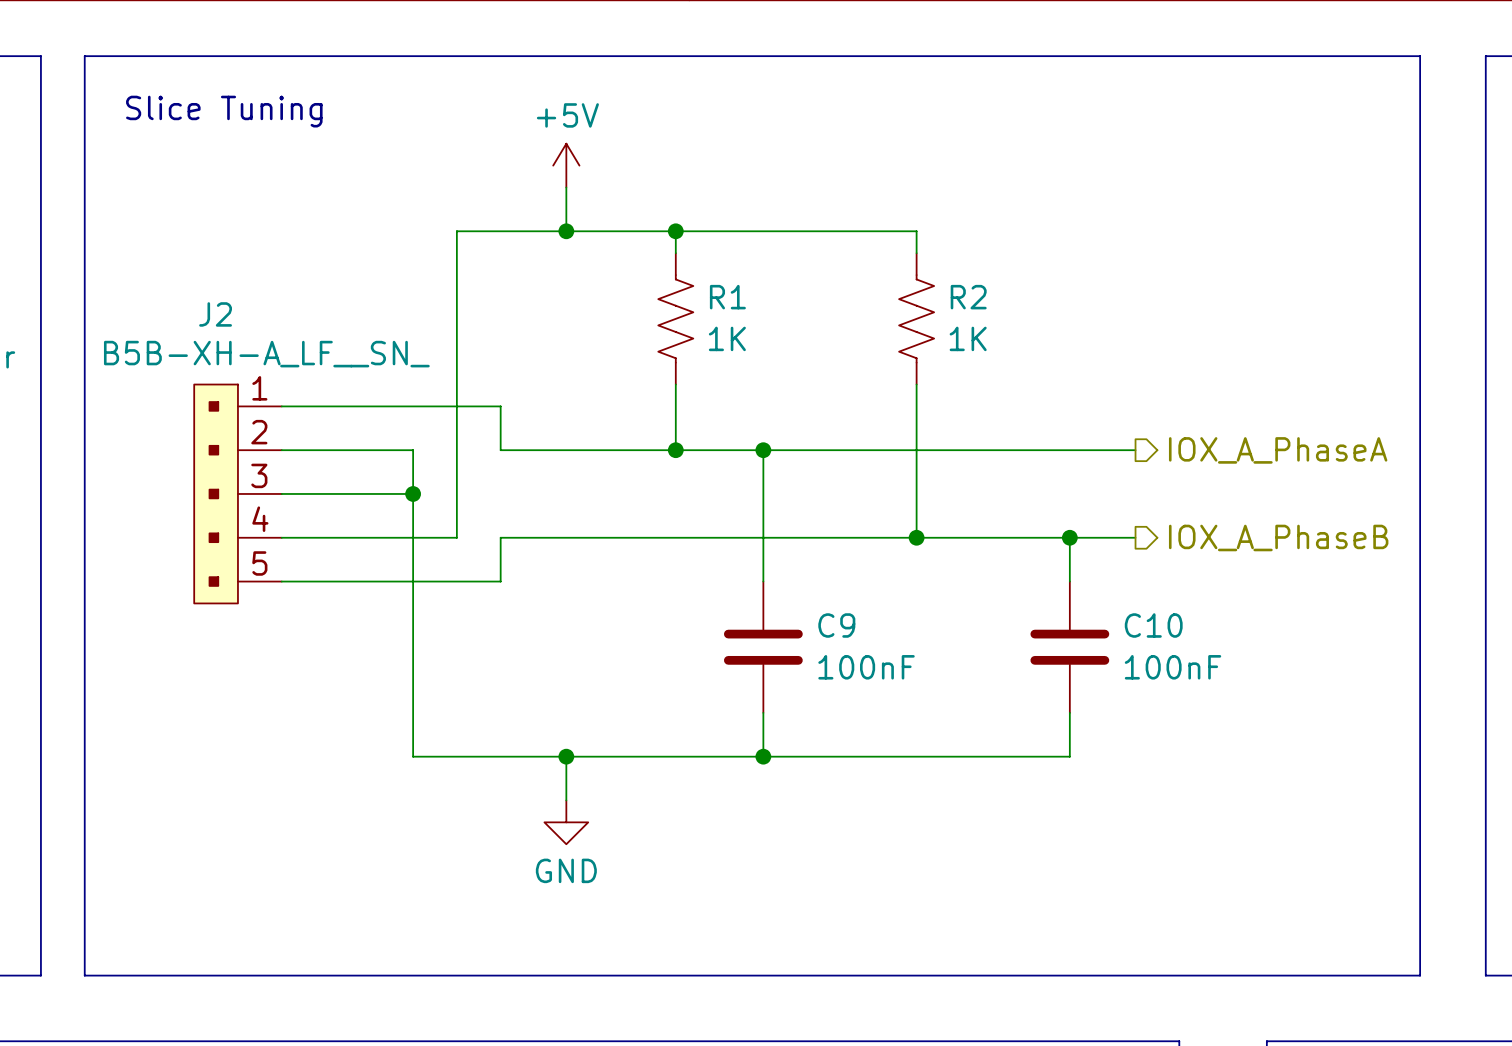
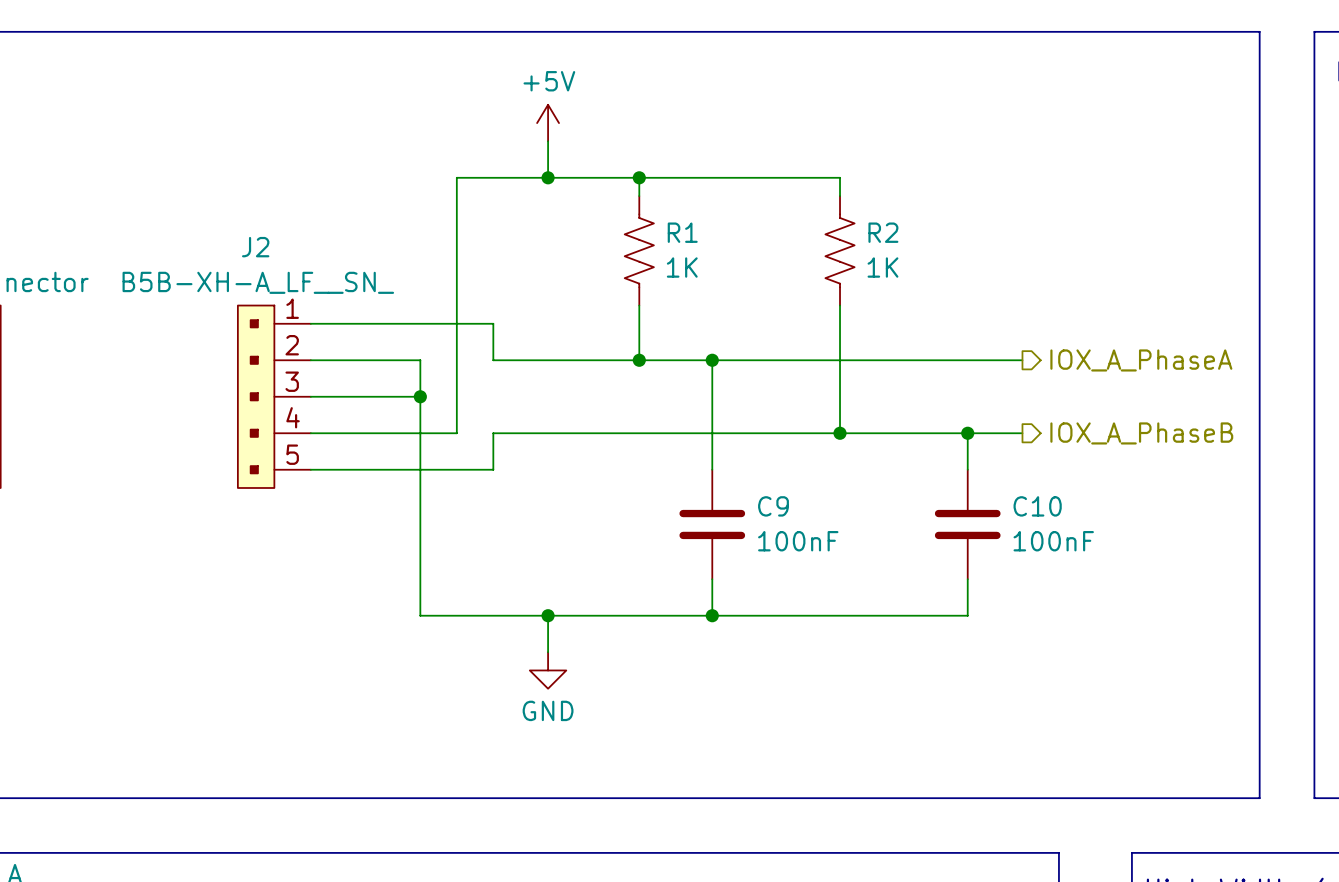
line: (40, 56) (40, 975) -> (110, 31) (146, 31)
line: (84, 56) (84, 975) -> (110, 798) (146, 798)
text: Slice Tuning (224, 111) -> none
J2 value position: B5B-XH-A_LF__SN_ (266, 354) -> B5B-XH-A_LF__SN_ (258, 282)

